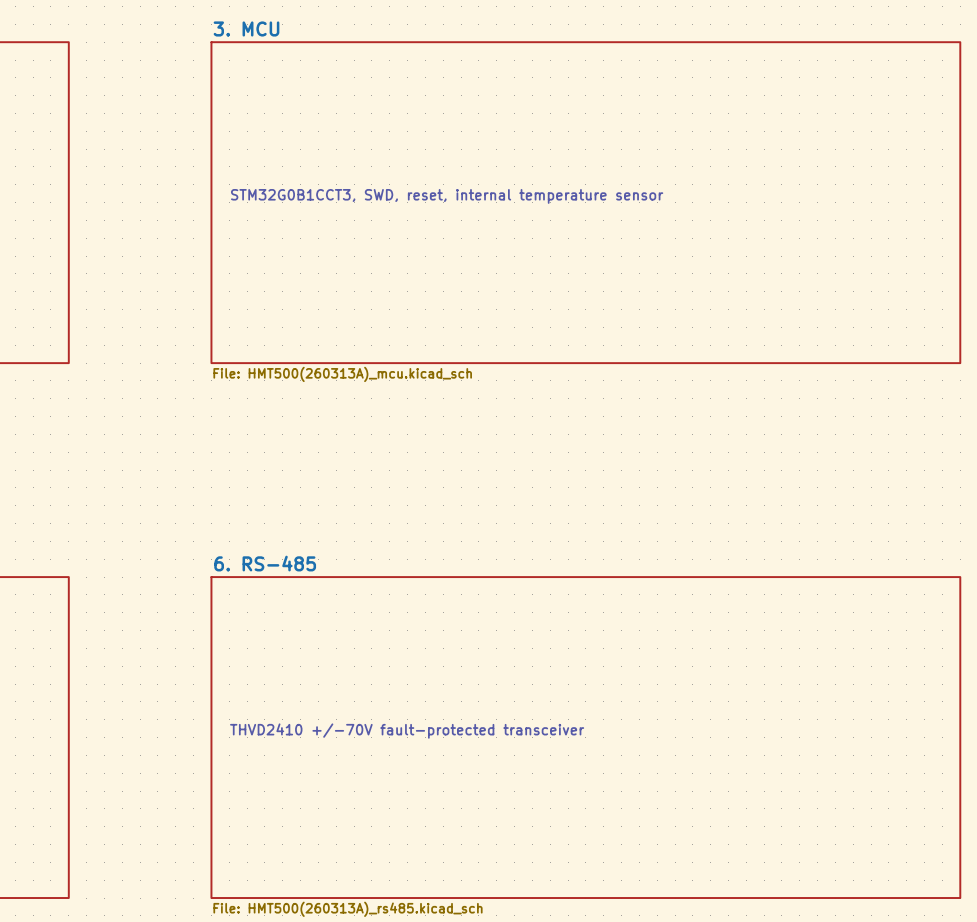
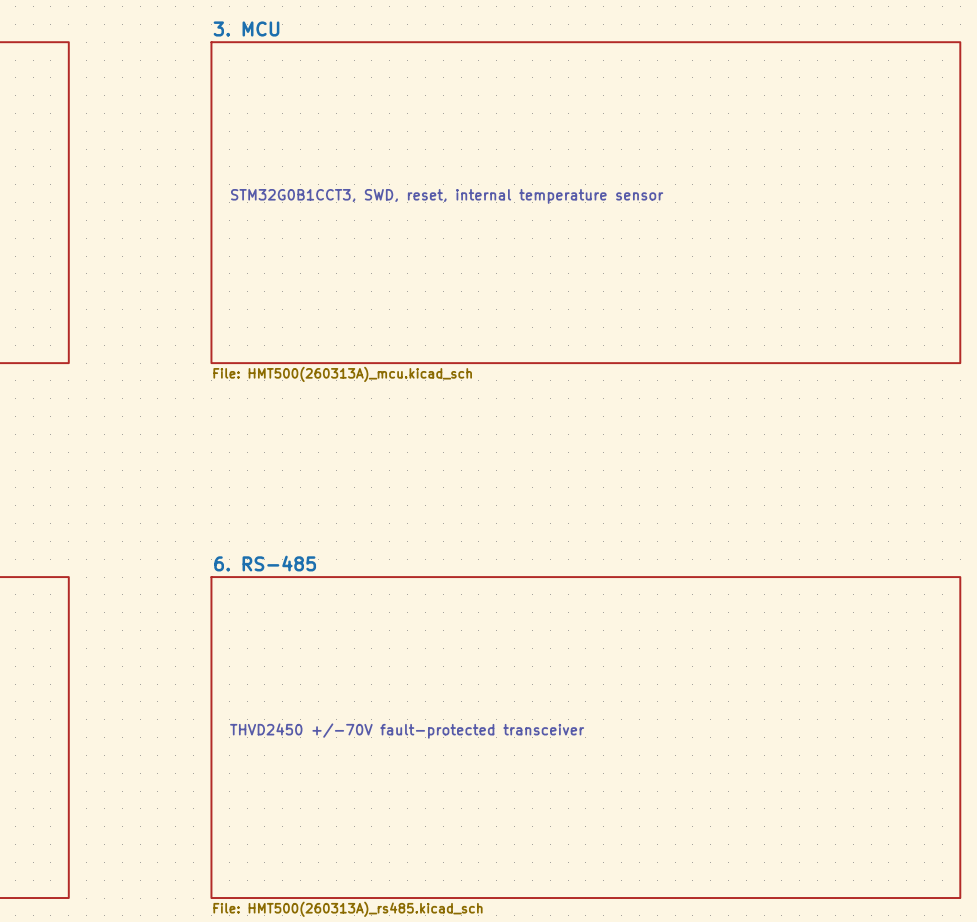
text: THVD2410 +/-70V fault-protected transceiver (407, 731) -> THVD2450 +/-70V fault-protected transceiver (407, 731)

